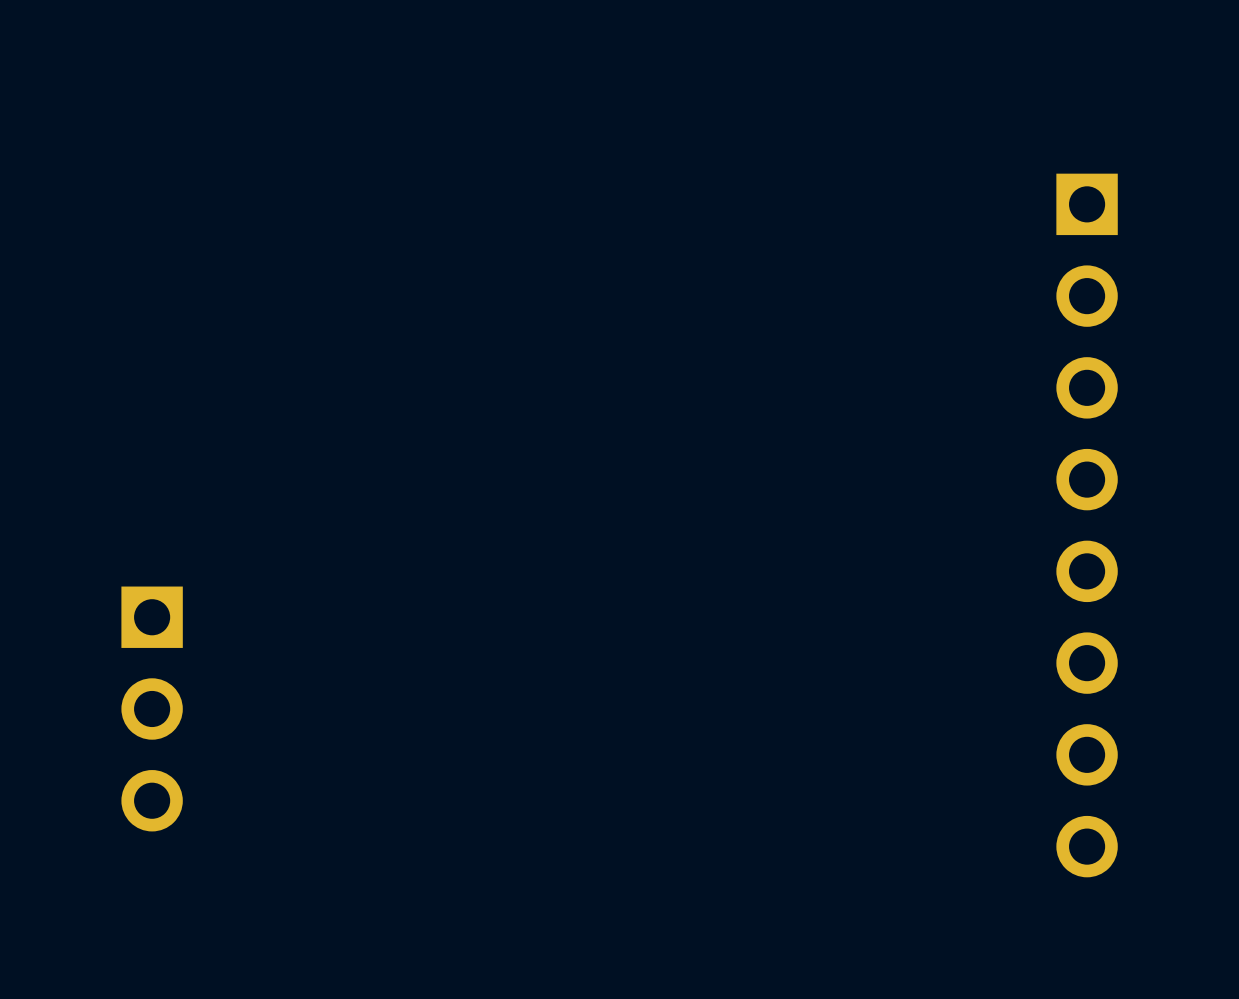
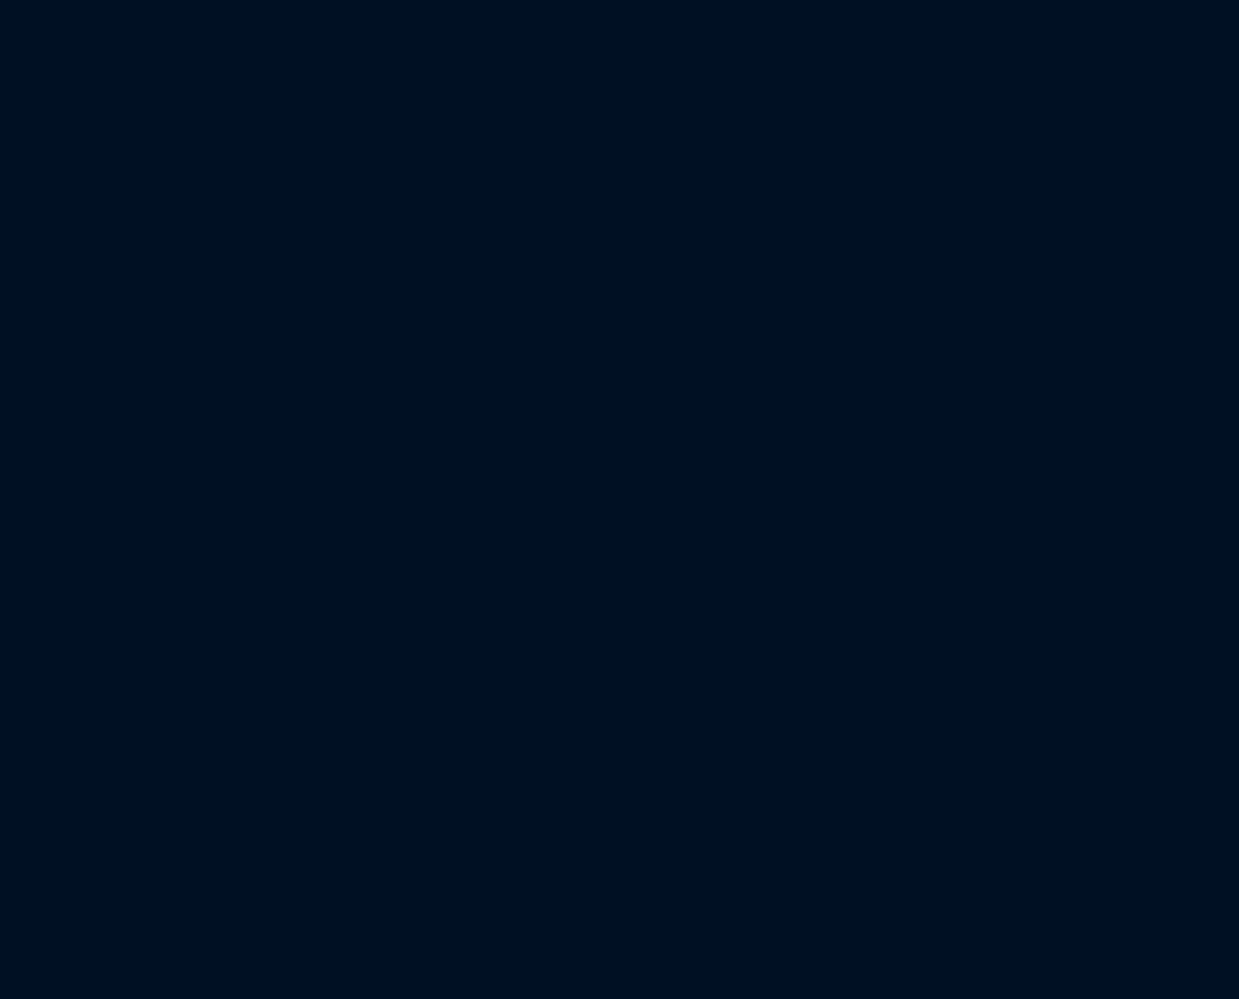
part: (1087, 525) -> none
part: (152, 708) -> none

